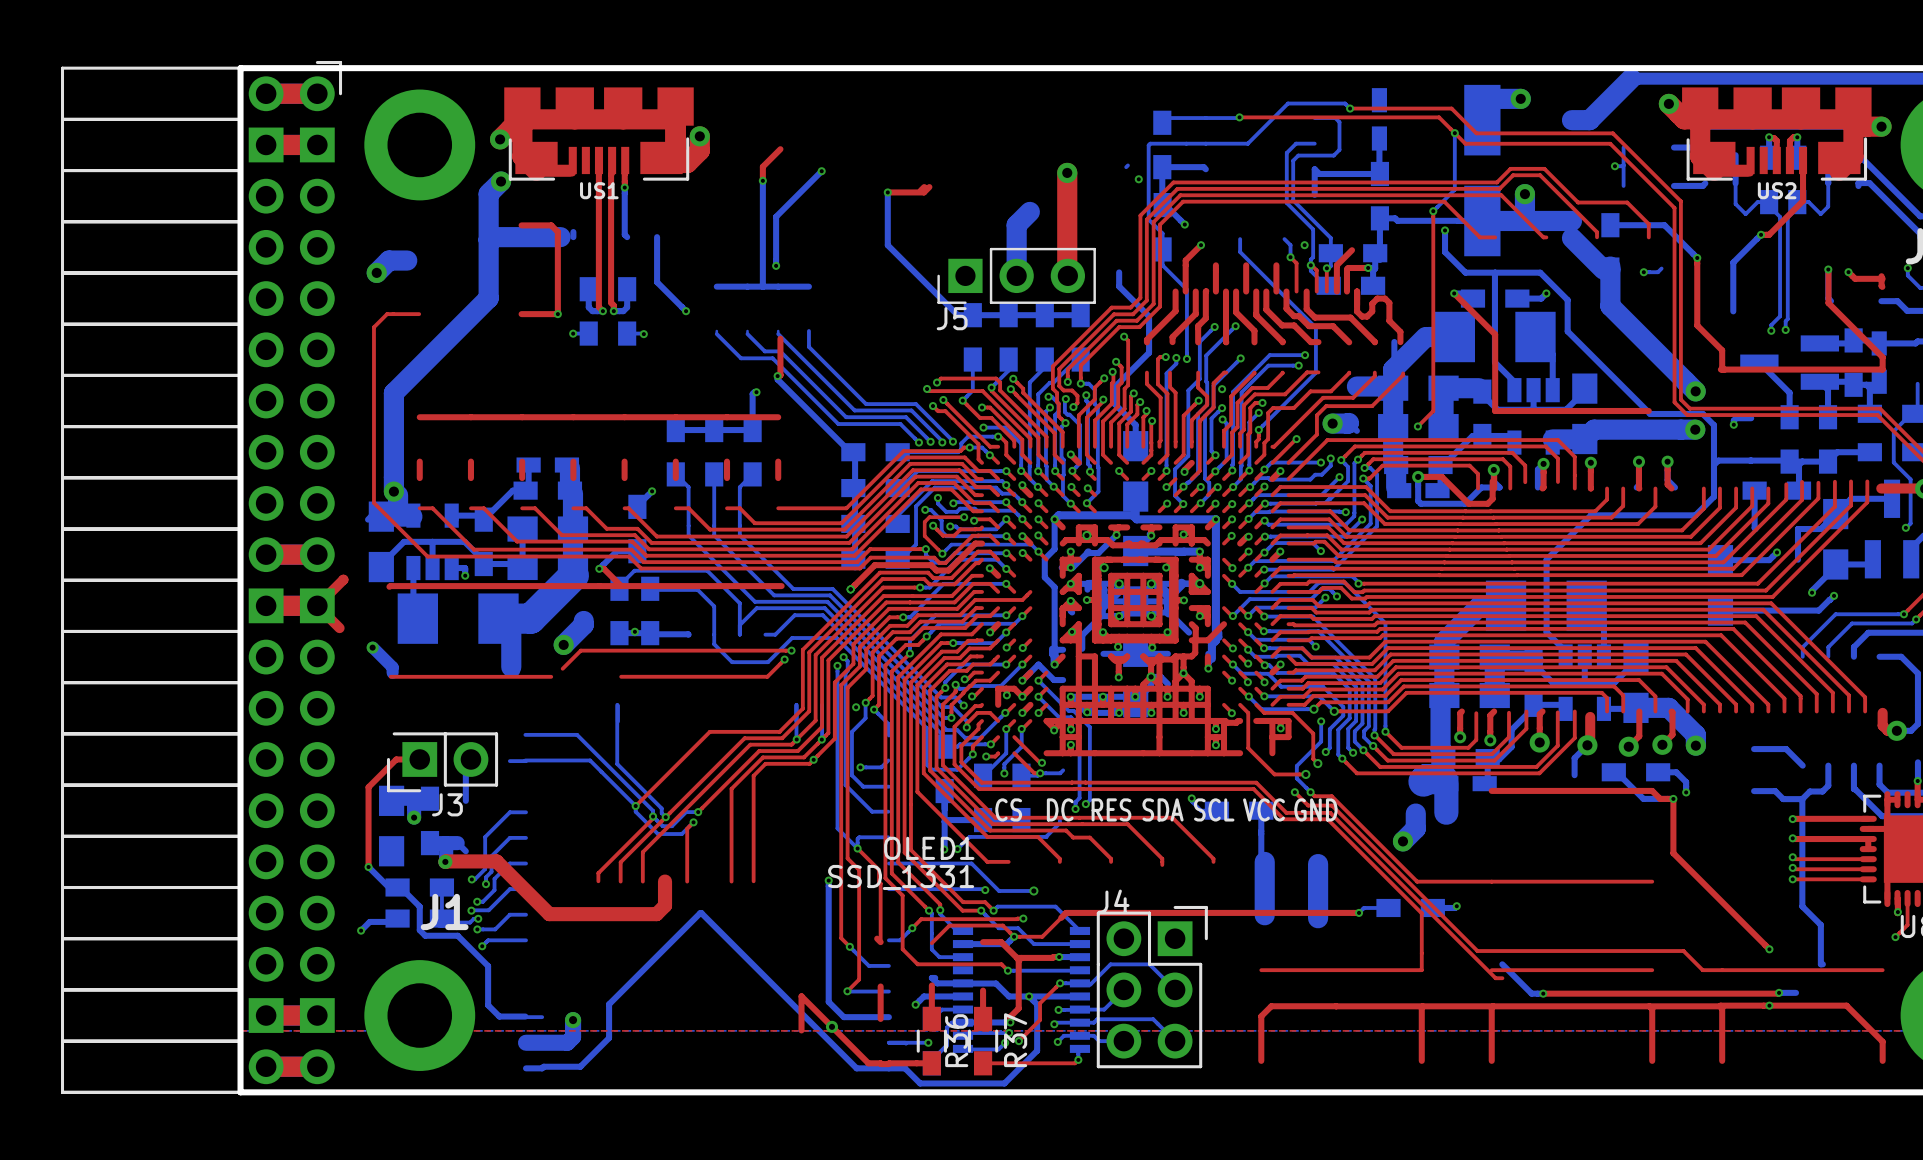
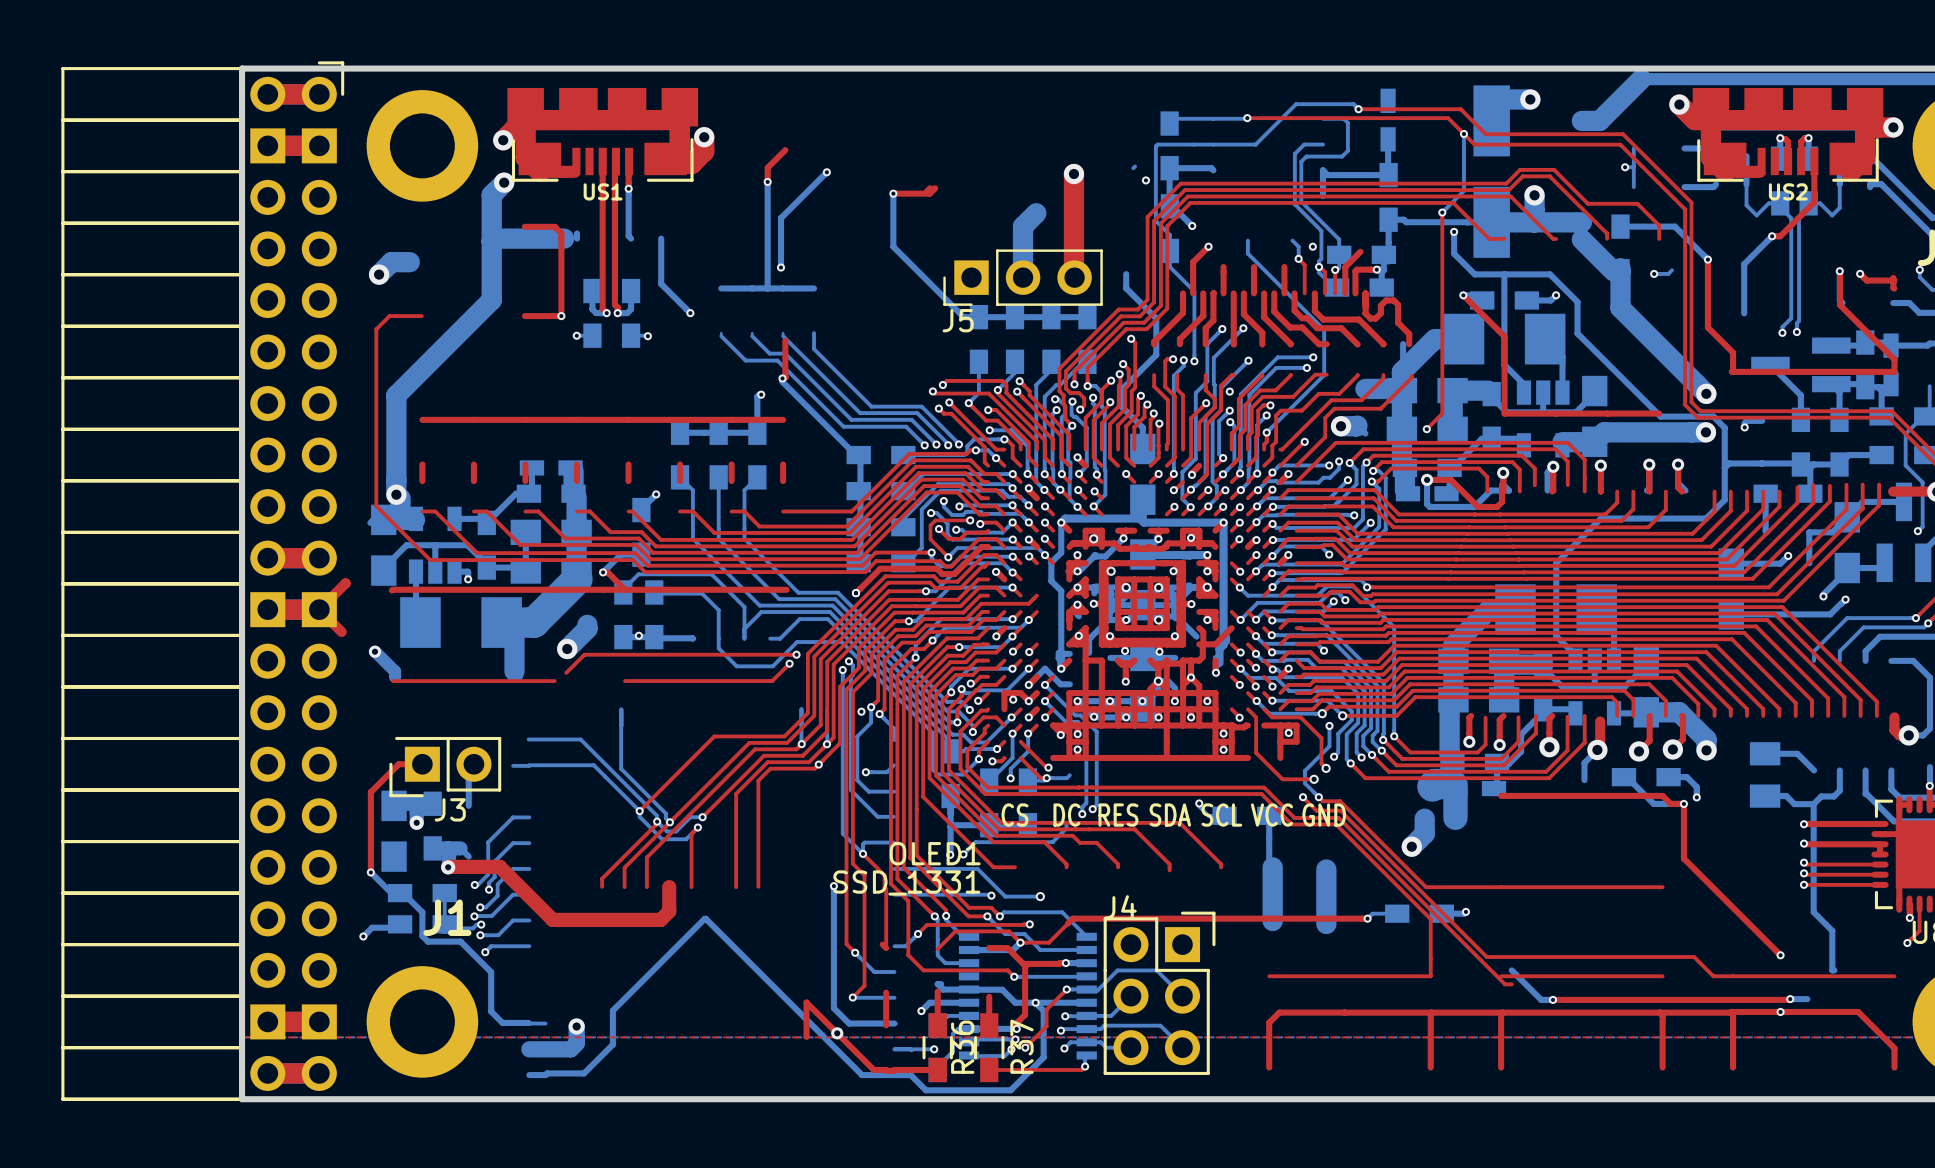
part: none -> (1765, 774)

